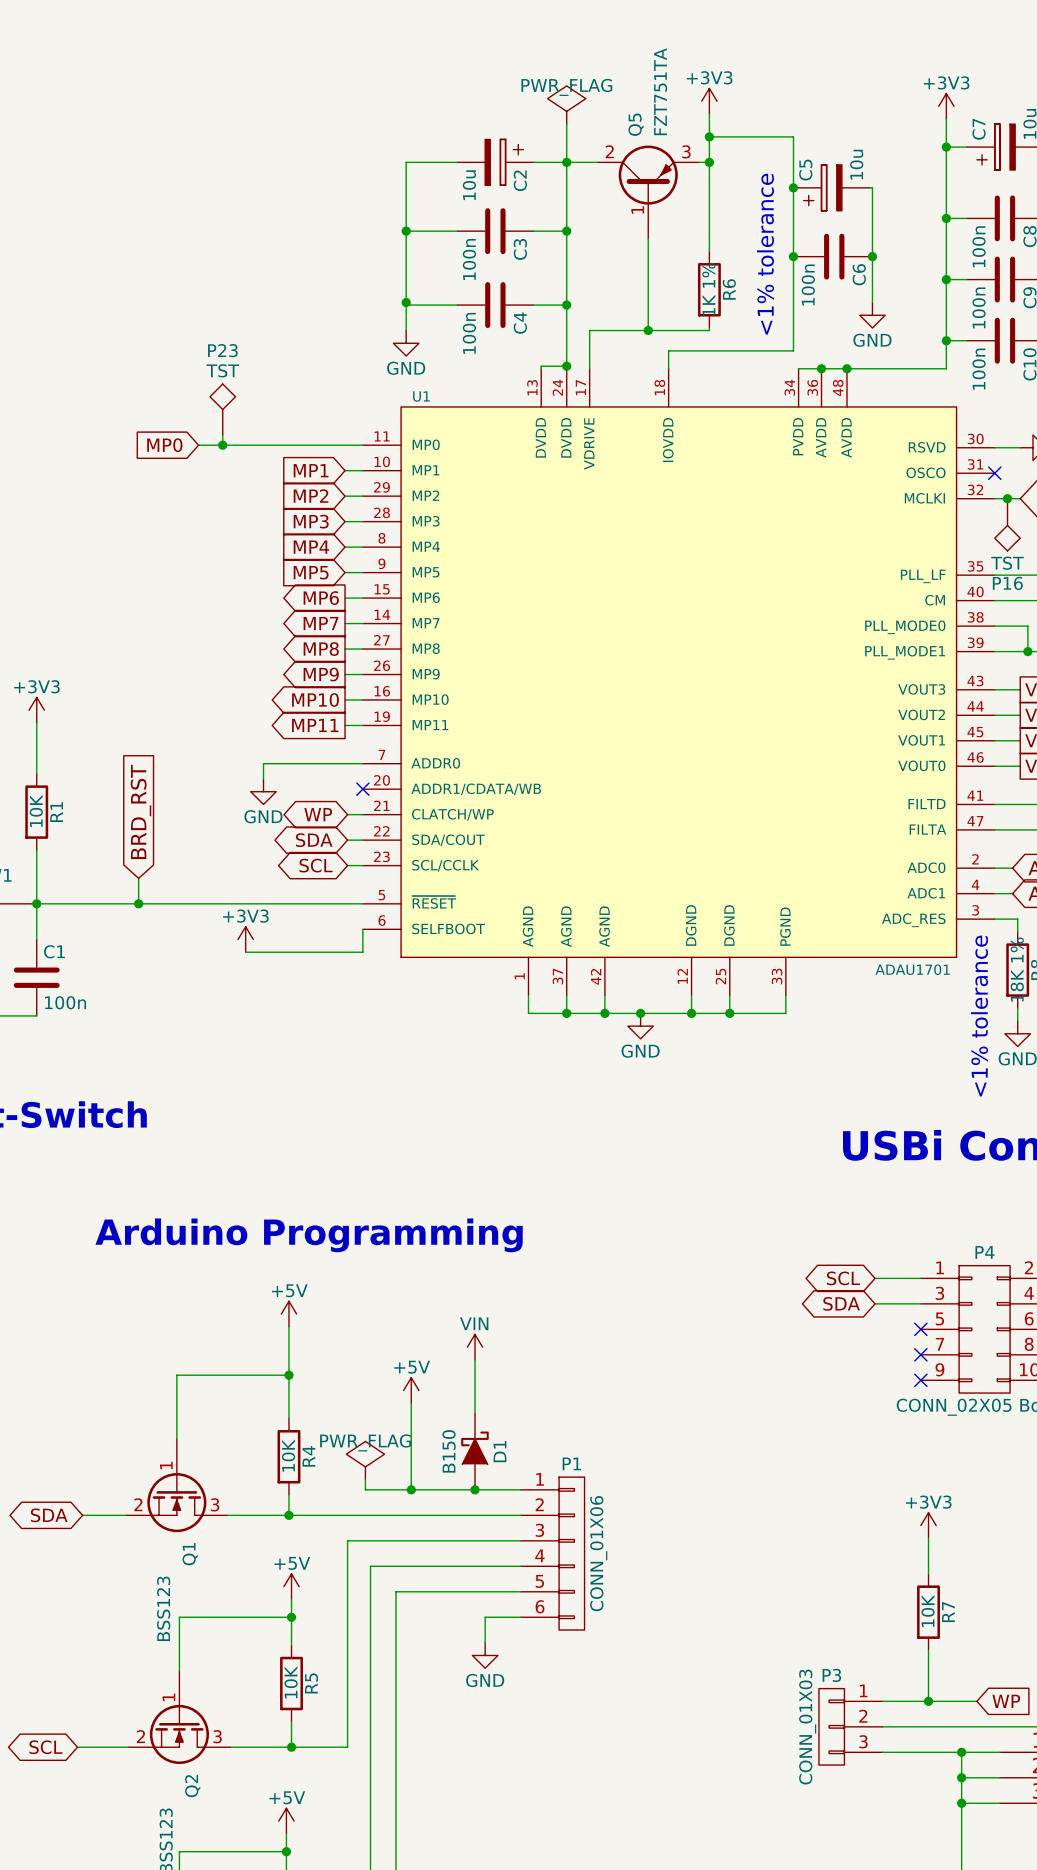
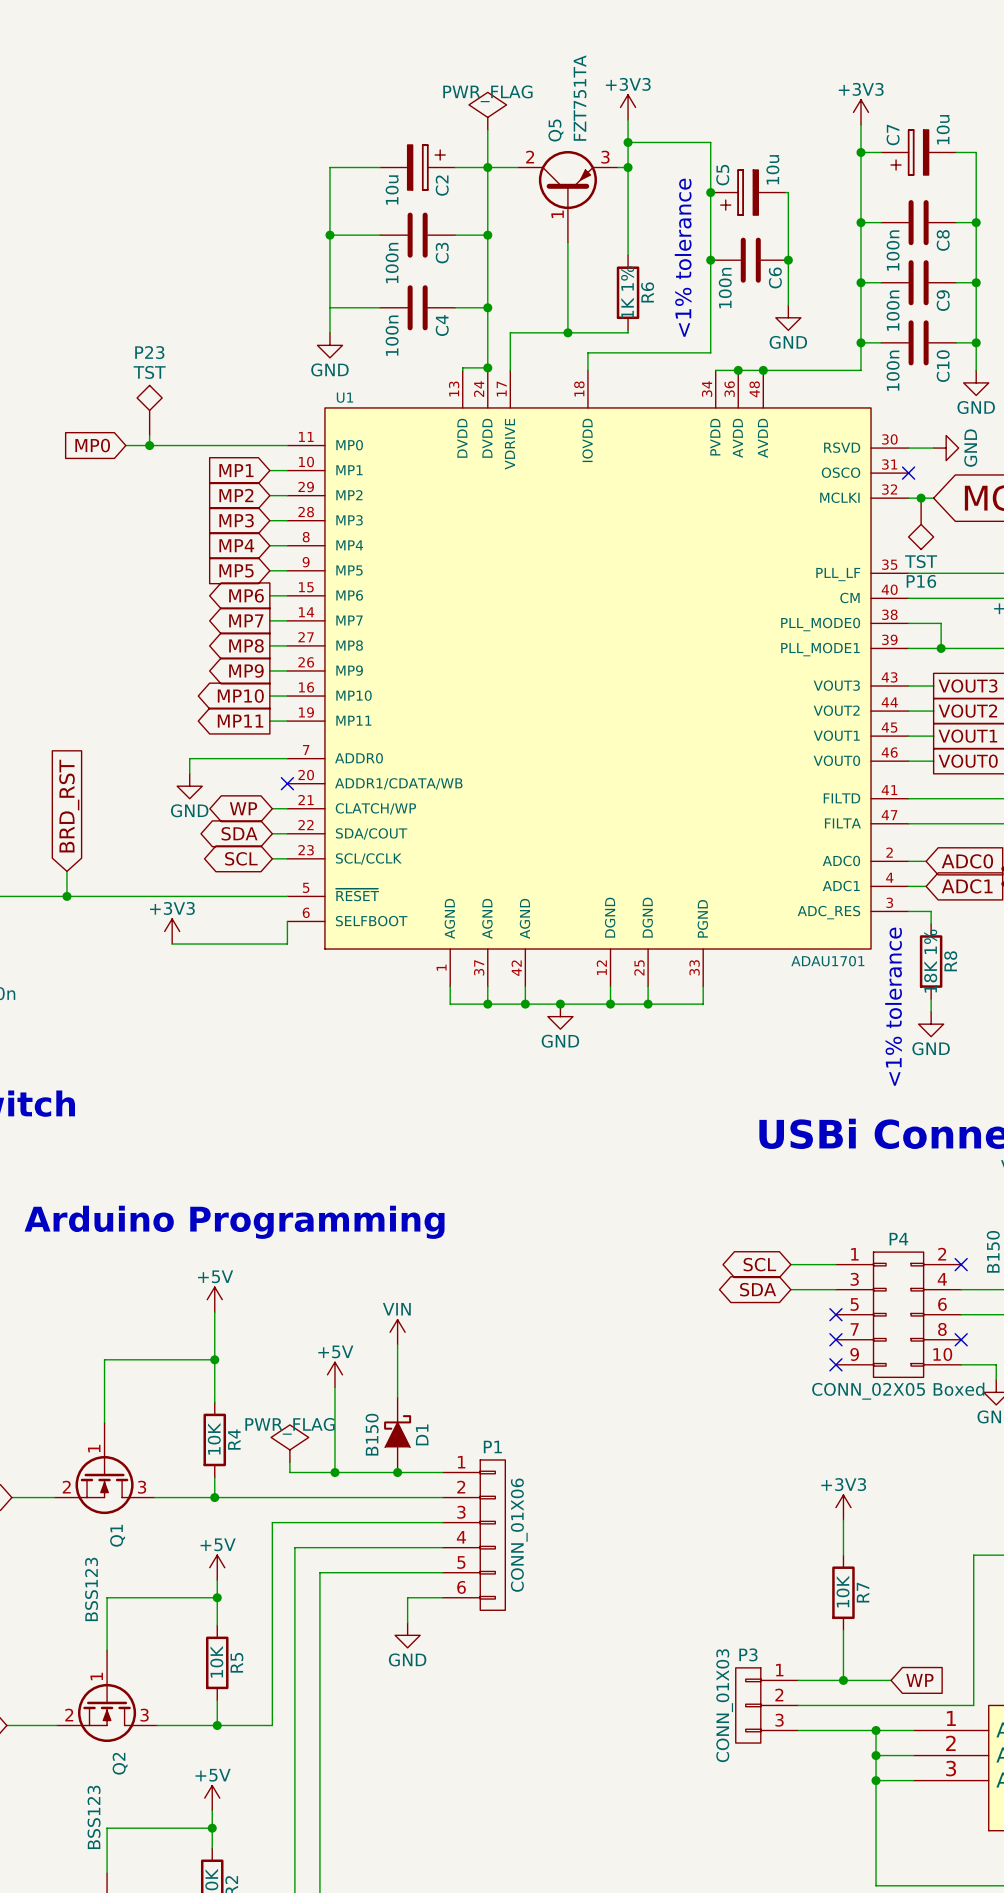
junction: (406, 302) -> none

